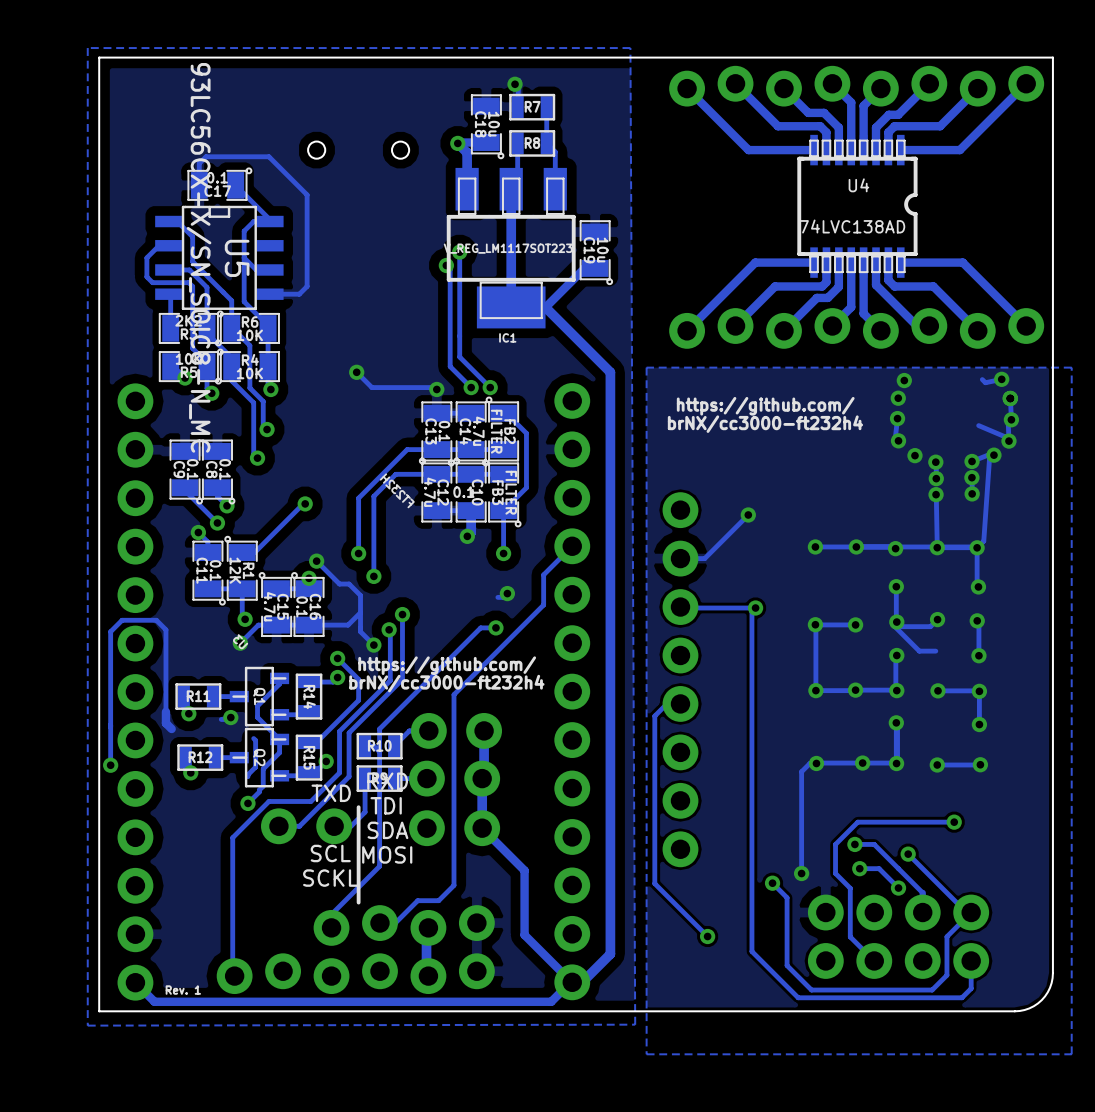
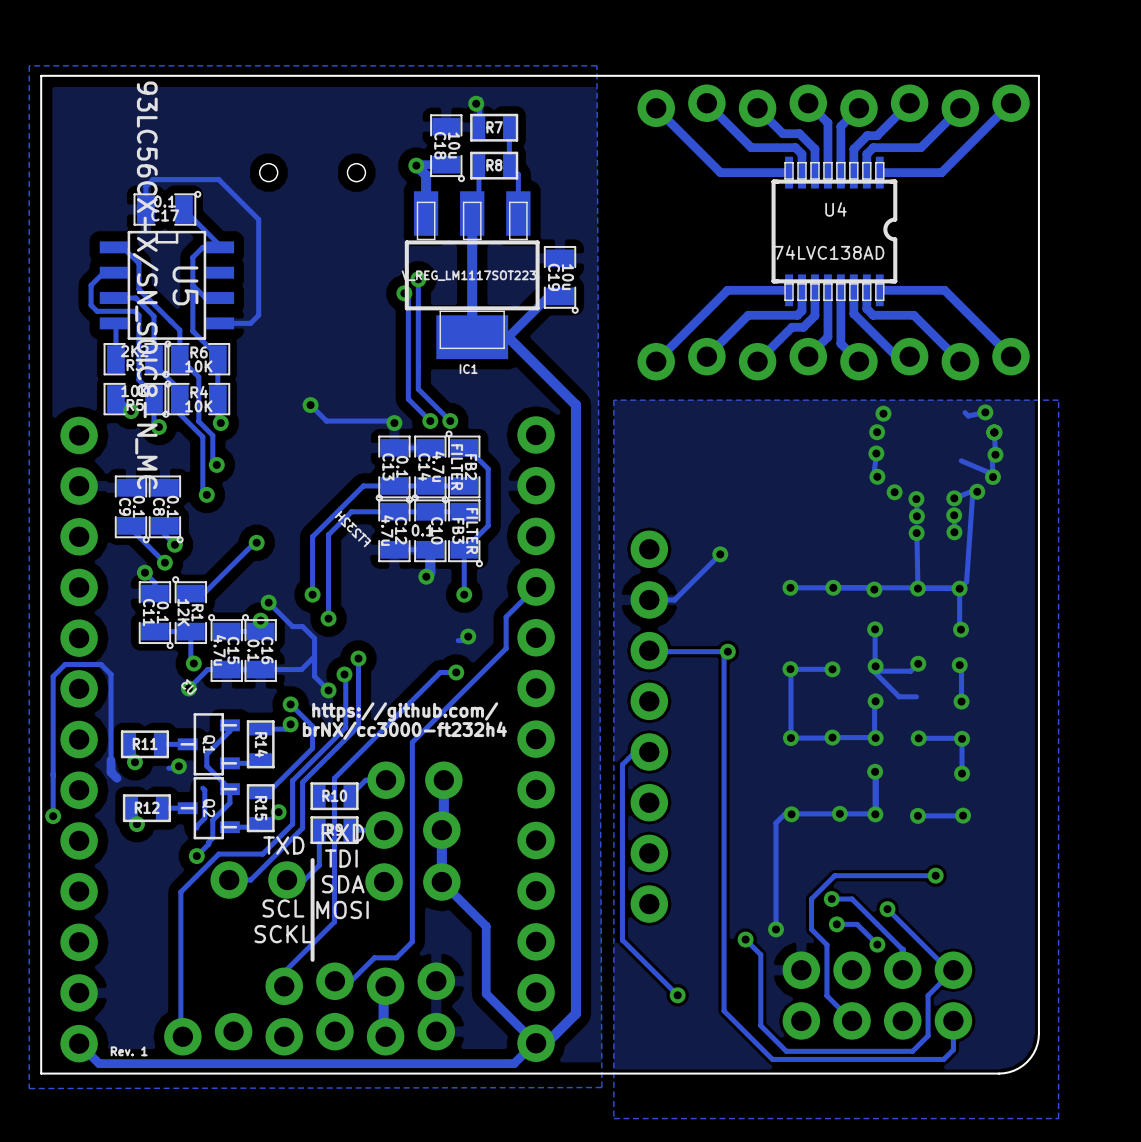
text: https://github.com/ (765, 406) -> none
text: brNX/cc3000-ft232h4 (765, 424) -> none

